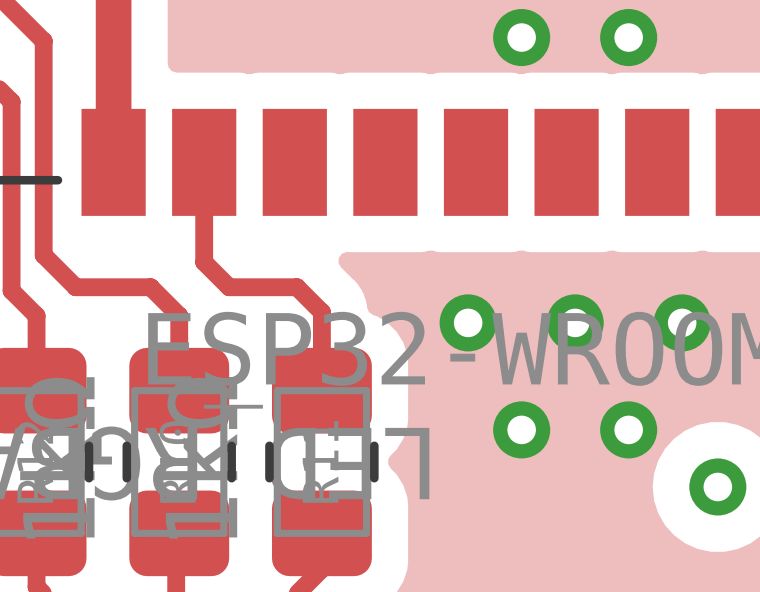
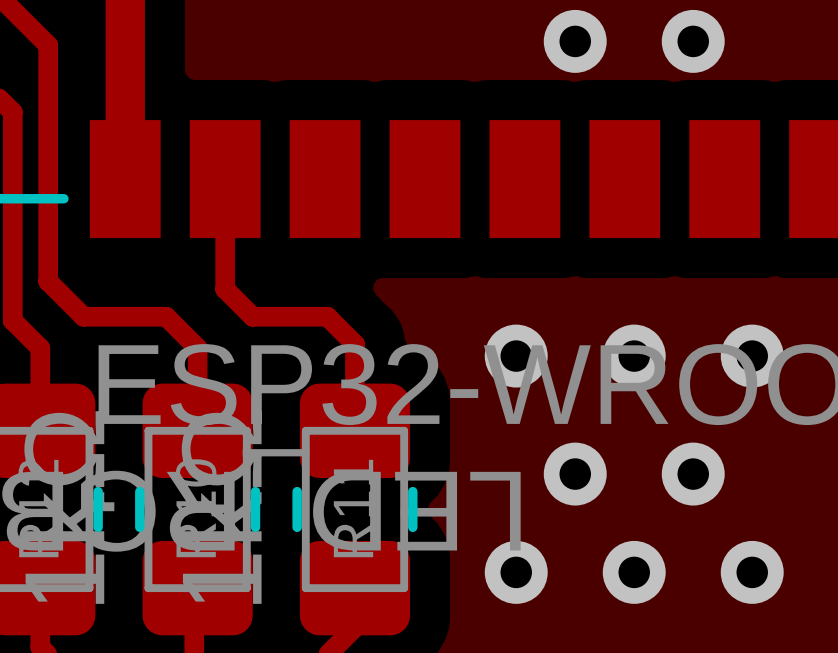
via position: (717, 486) -> (752, 572)
via: none -> (516, 572)
via: none -> (634, 572)

